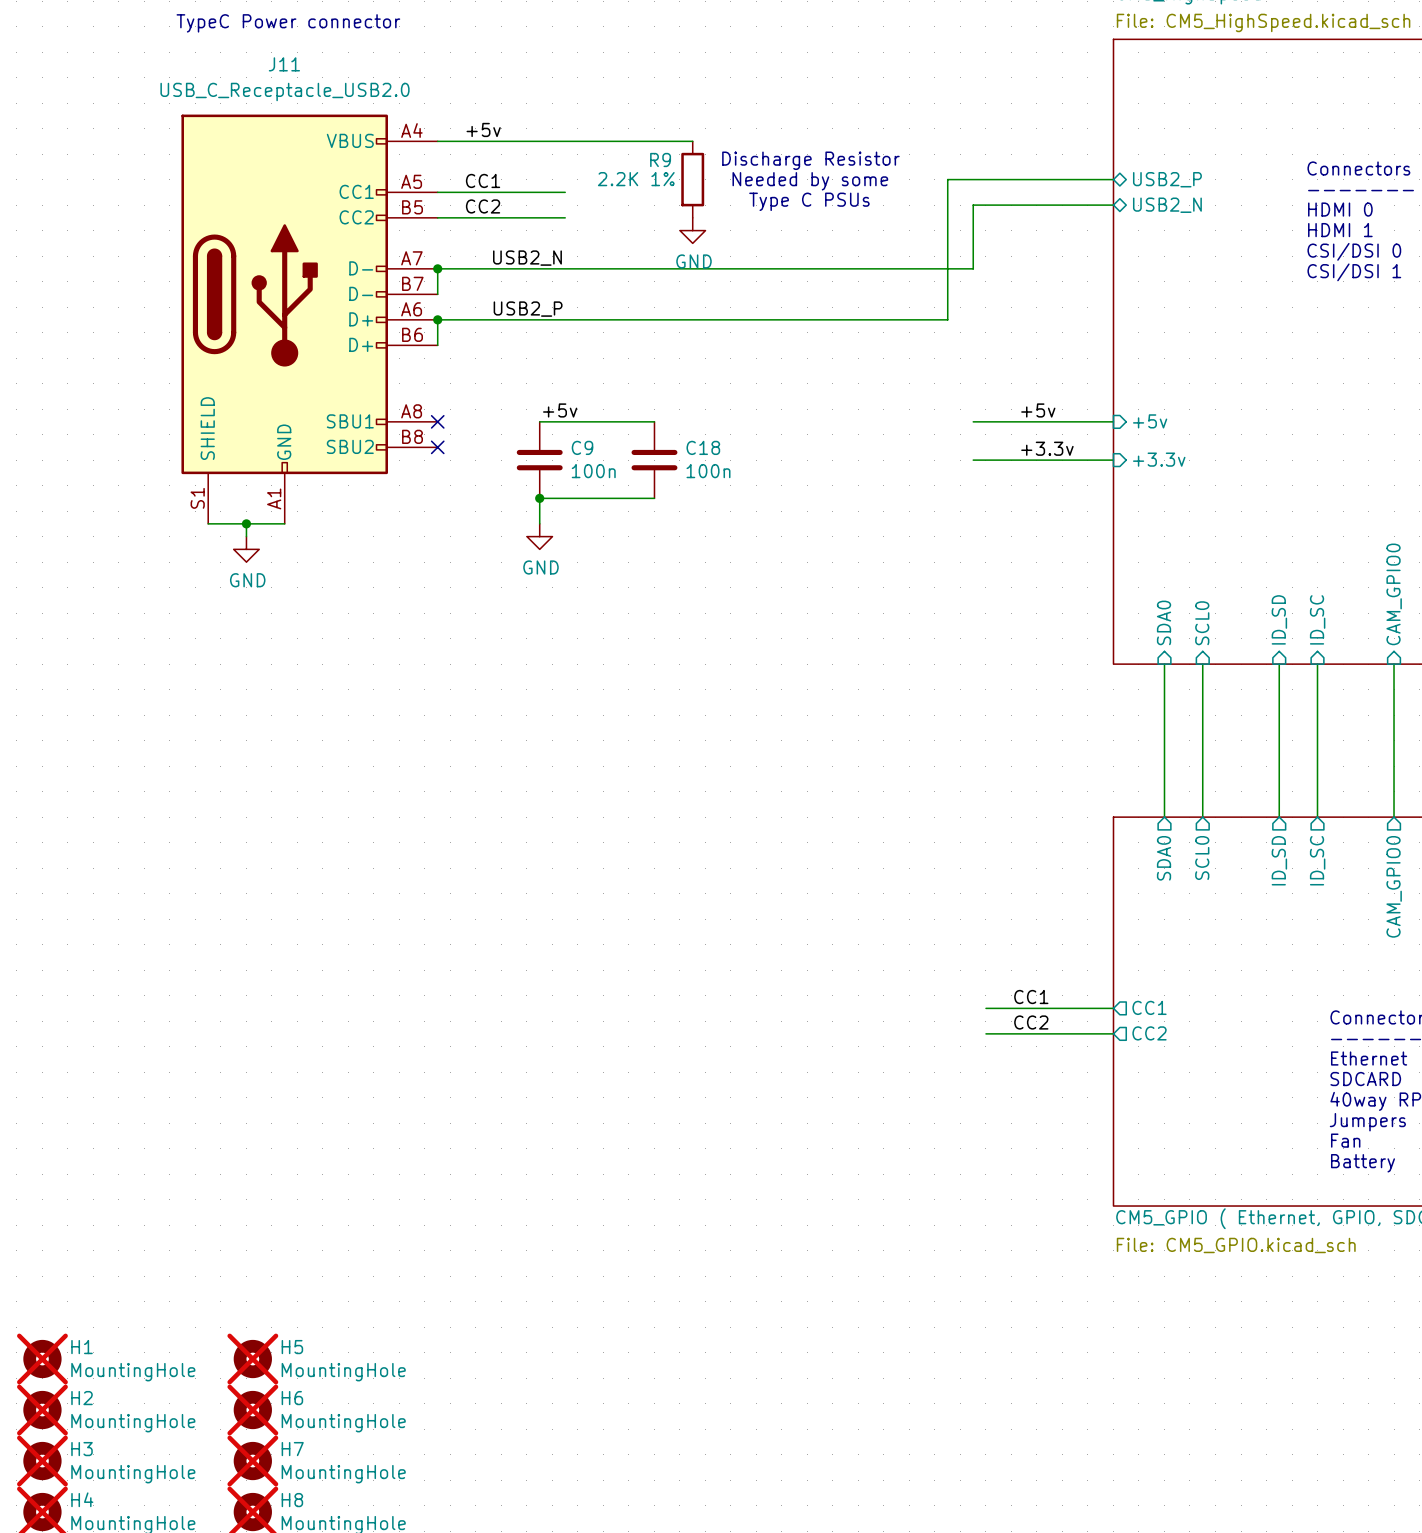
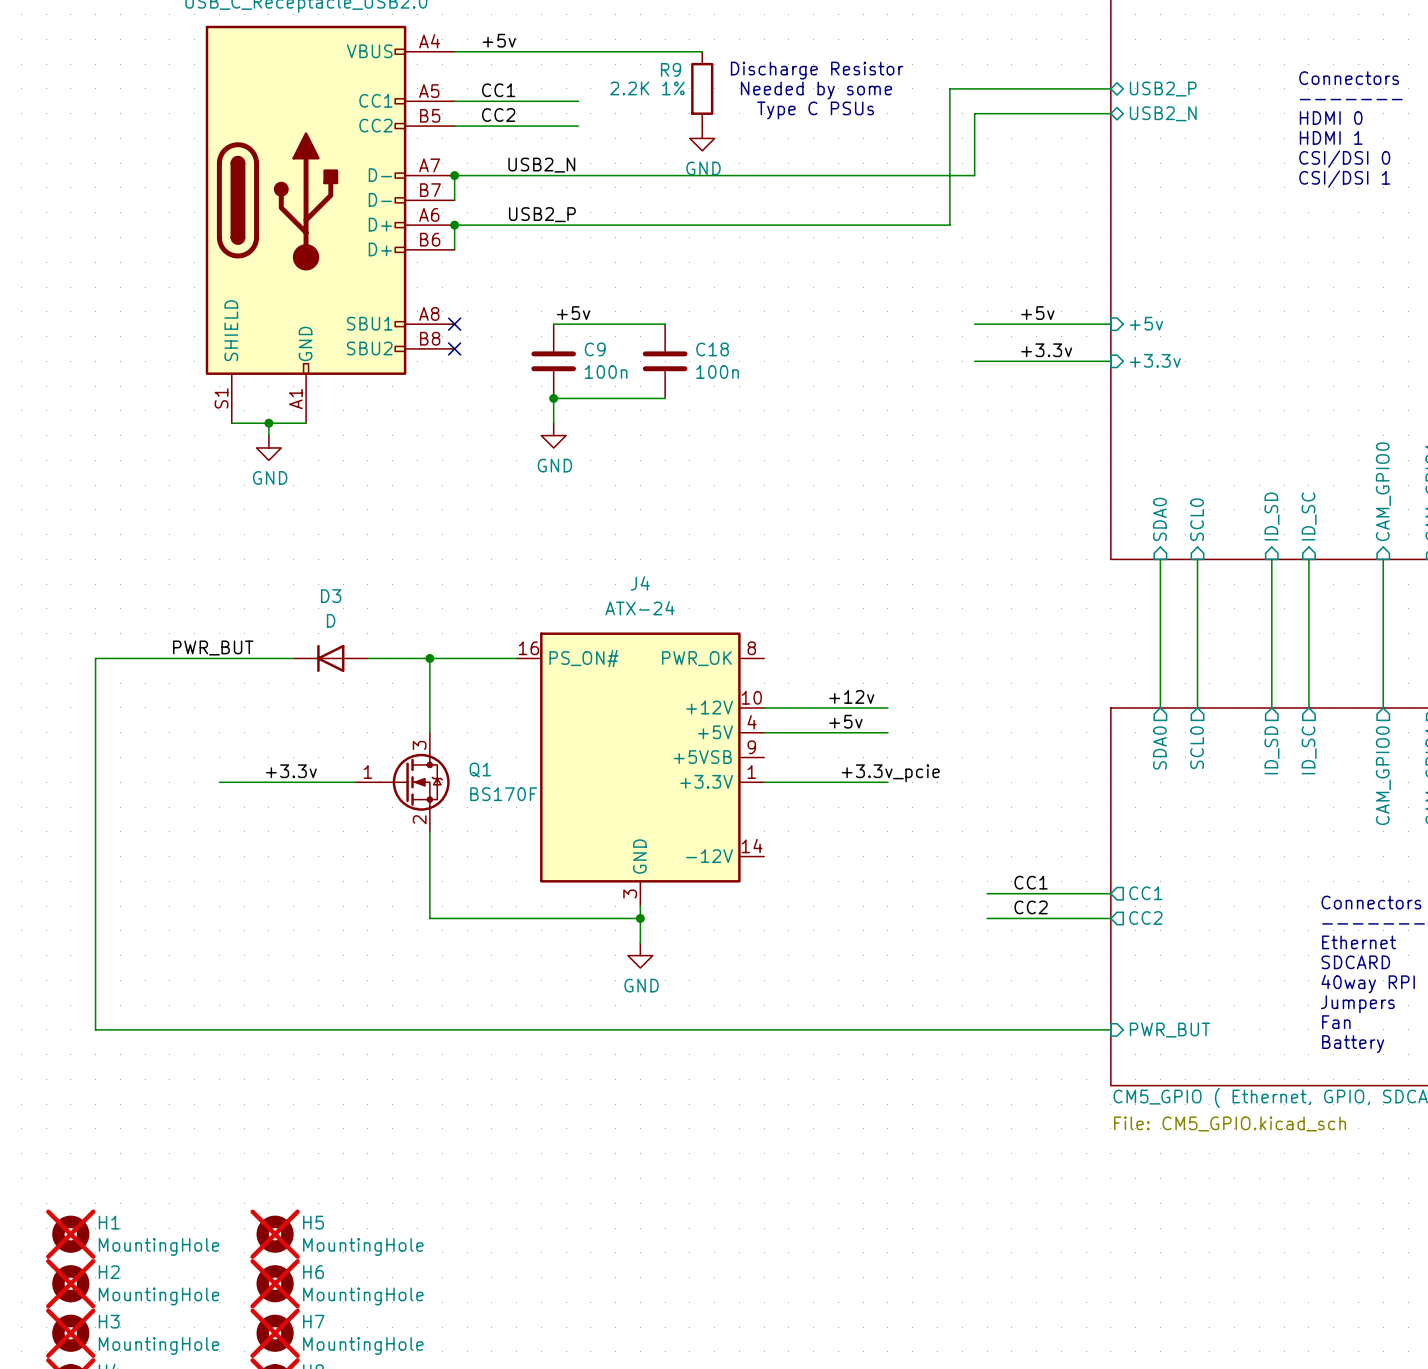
label: none -> PWR_BUT (213, 648)
wire: none -> (293, 658) (95, 658) (95, 1029) (1110, 1029)
D3: none -> D (330, 658)
wire: none -> (367, 658) (516, 658)
wire: none -> (429, 658) (429, 732)
junction: none -> (429, 658)
label: none -> +12v (851, 696)
wire: none -> (764, 707) (887, 707)
label: none -> +5v (845, 721)
wire: none -> (764, 732) (887, 732)
J4: none -> ATX-24 (640, 769)
label: none -> +3.3v (291, 771)
label: none -> +3.3v_pcie (890, 773)
wire: none -> (219, 782) (355, 782)
Q1: none -> BS170F (402, 782)
wire: none -> (764, 782) (887, 782)
wire: none -> (429, 831) (429, 918) (640, 918)
wire: none -> (640, 906) (640, 943)
junction: none -> (640, 918)
power symbol: none -> GND (640, 955)
sheet pin: none -> PWR_BUT (1170, 1030)

